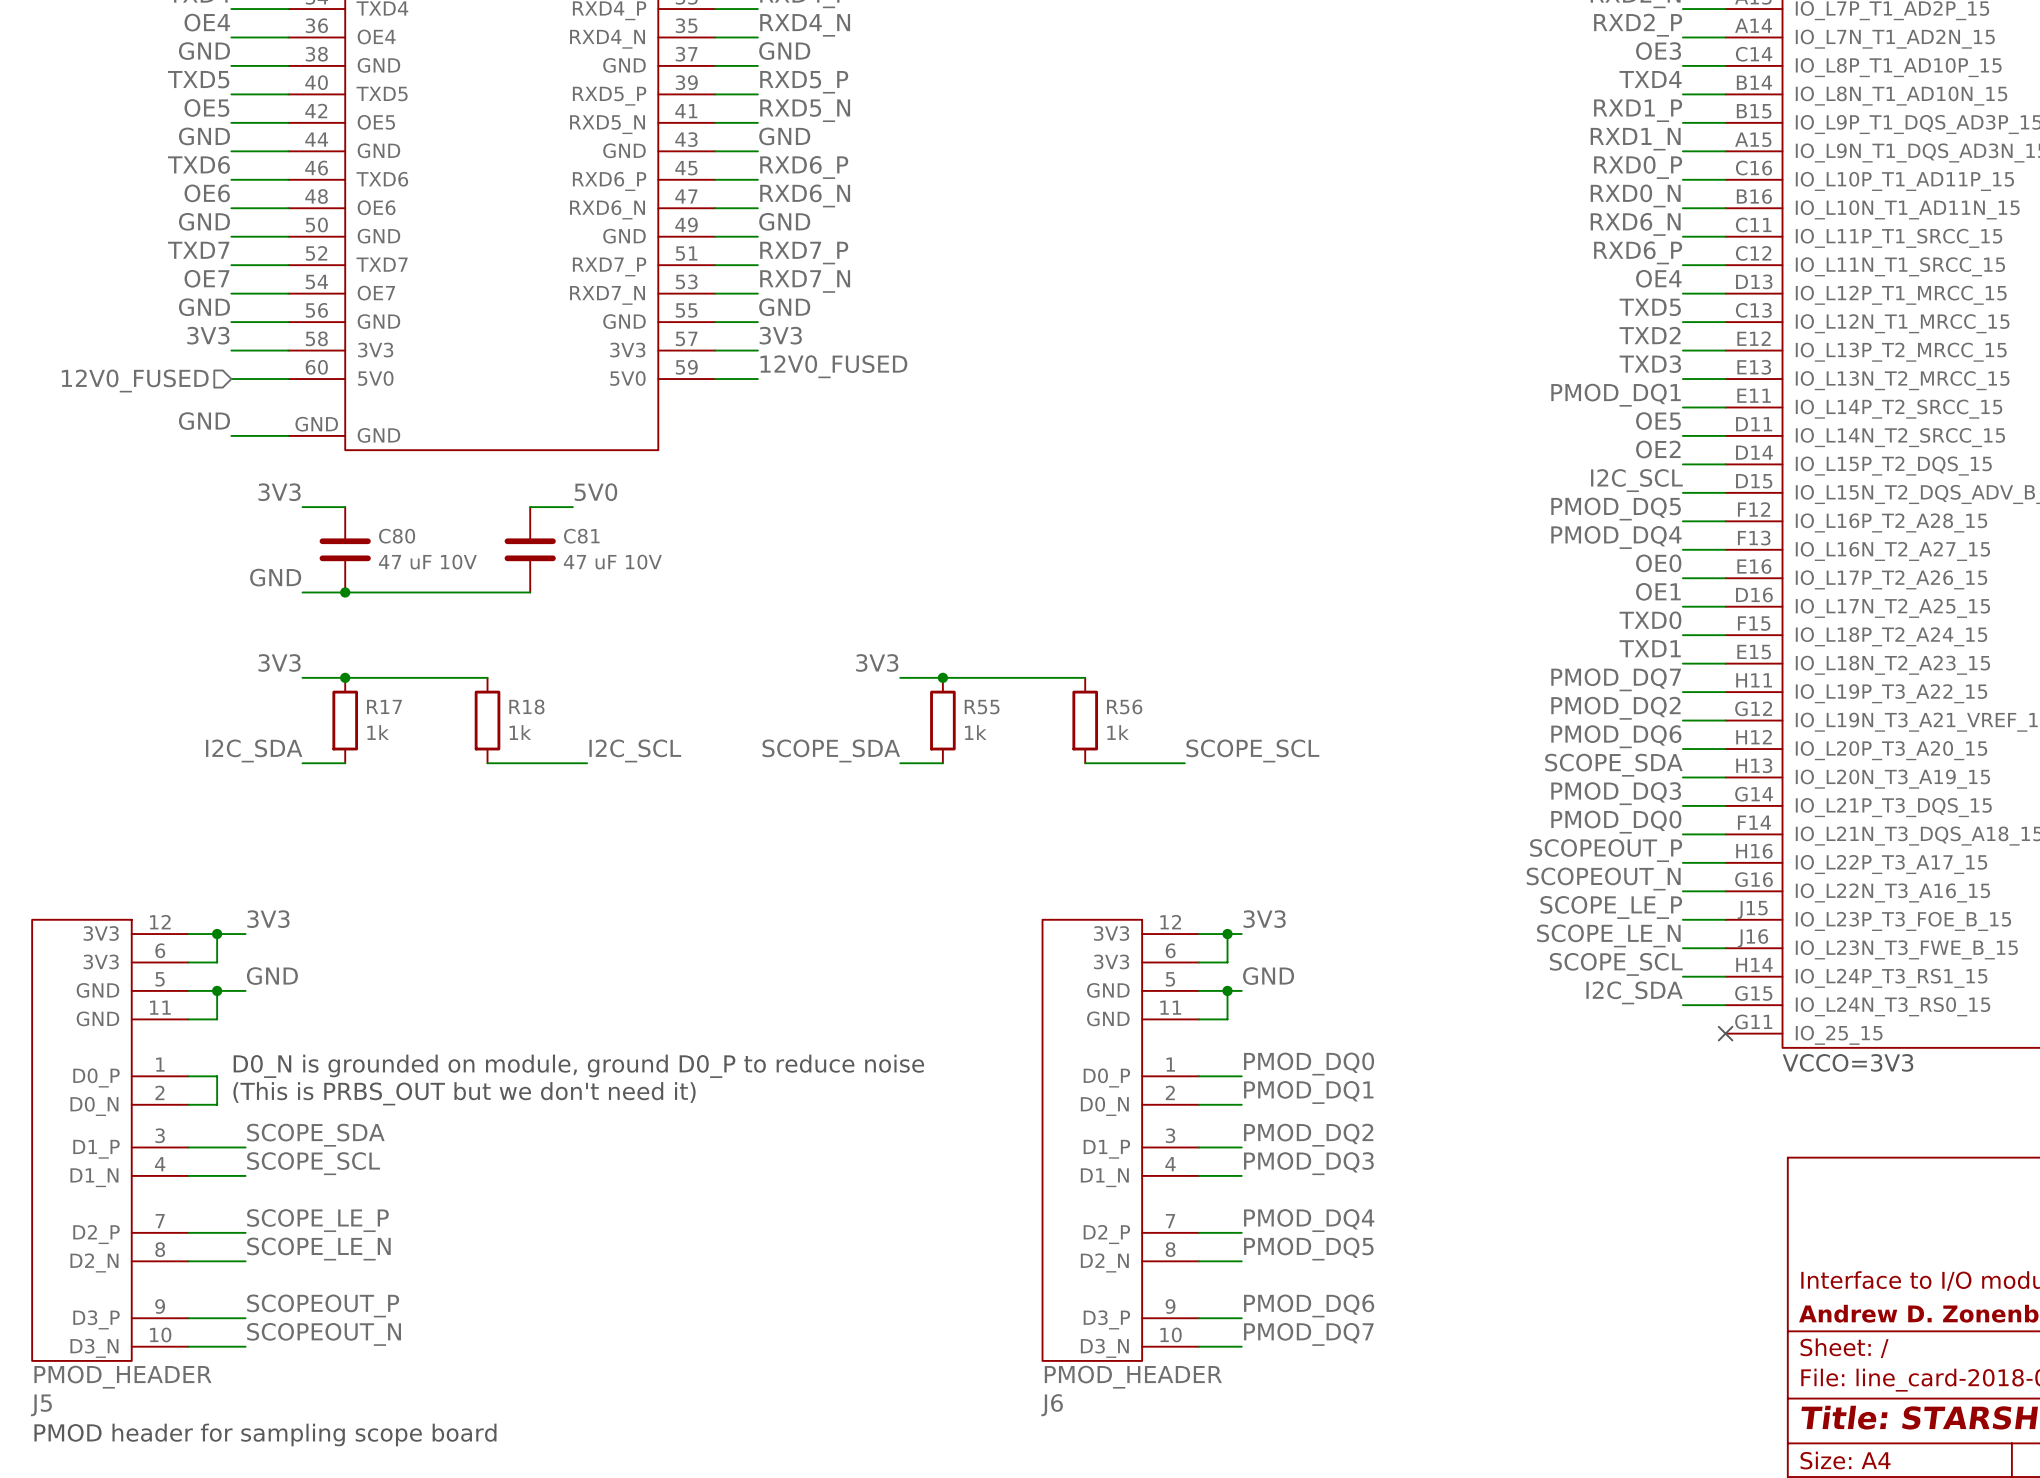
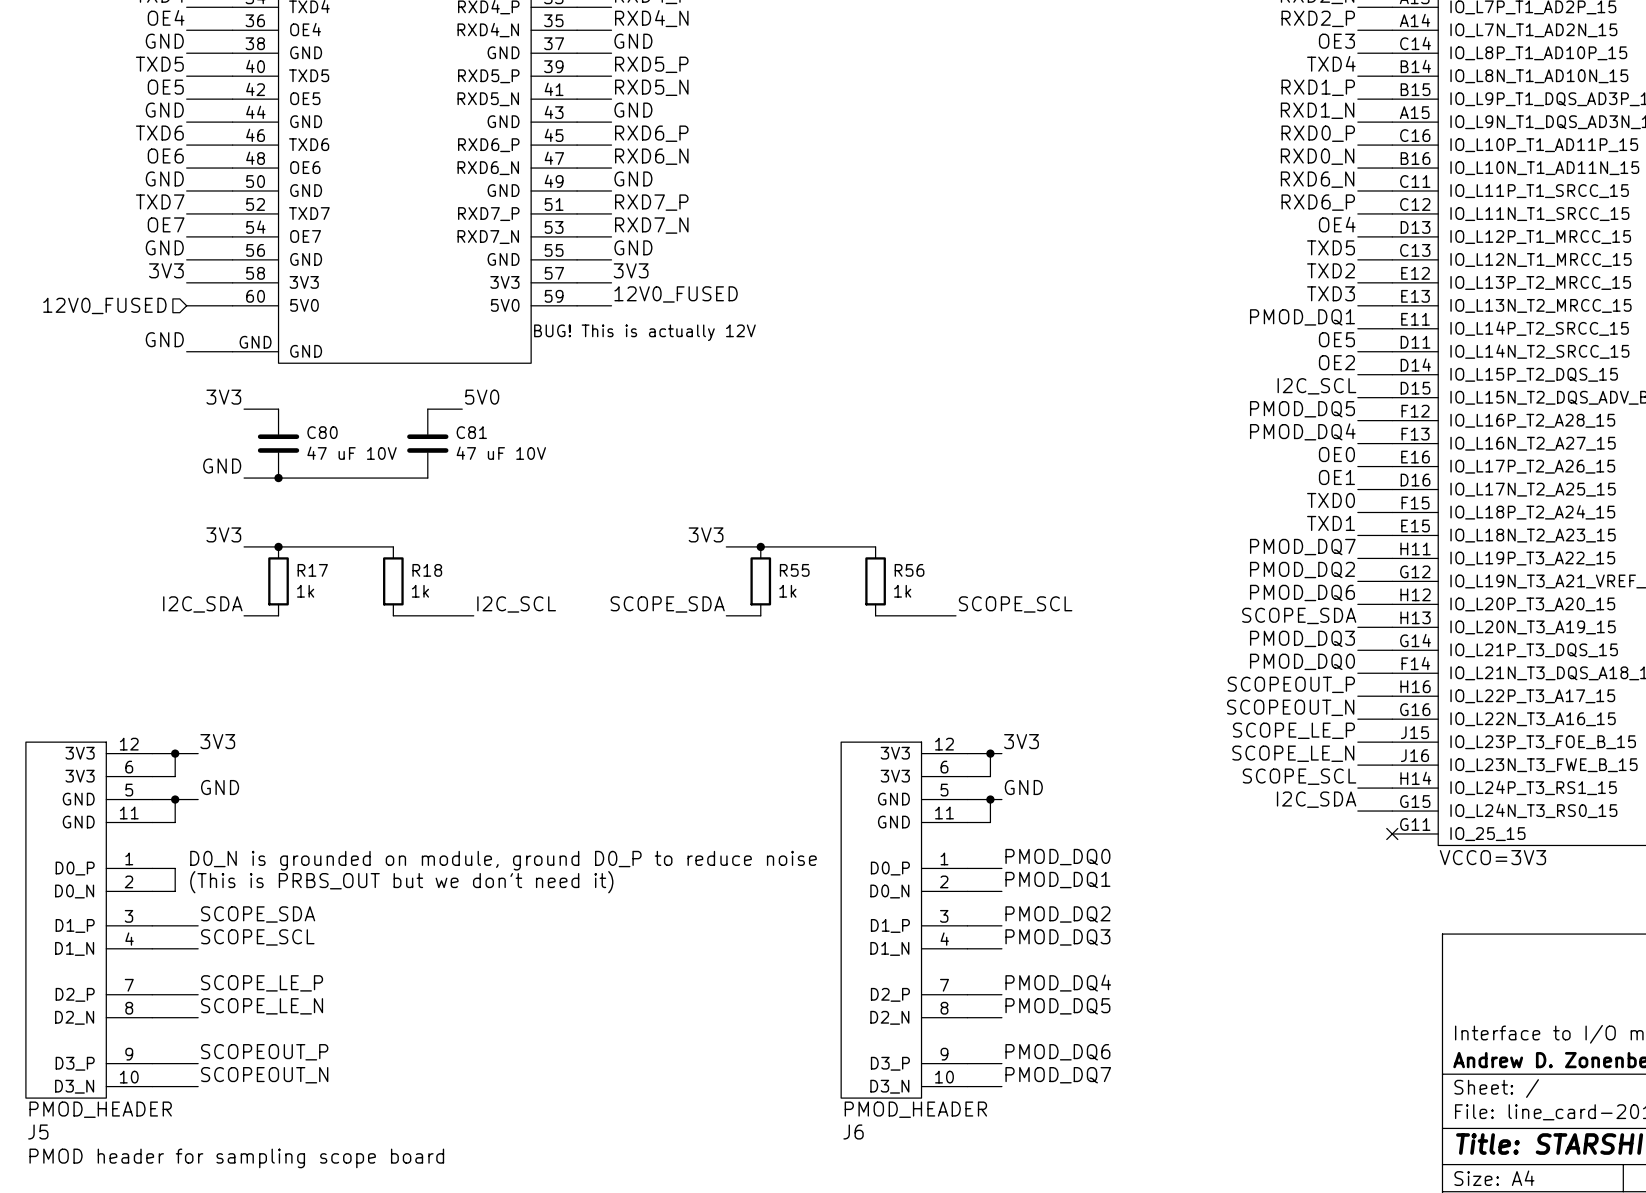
text: none -> BUG! This is actually 12V (644, 332)

